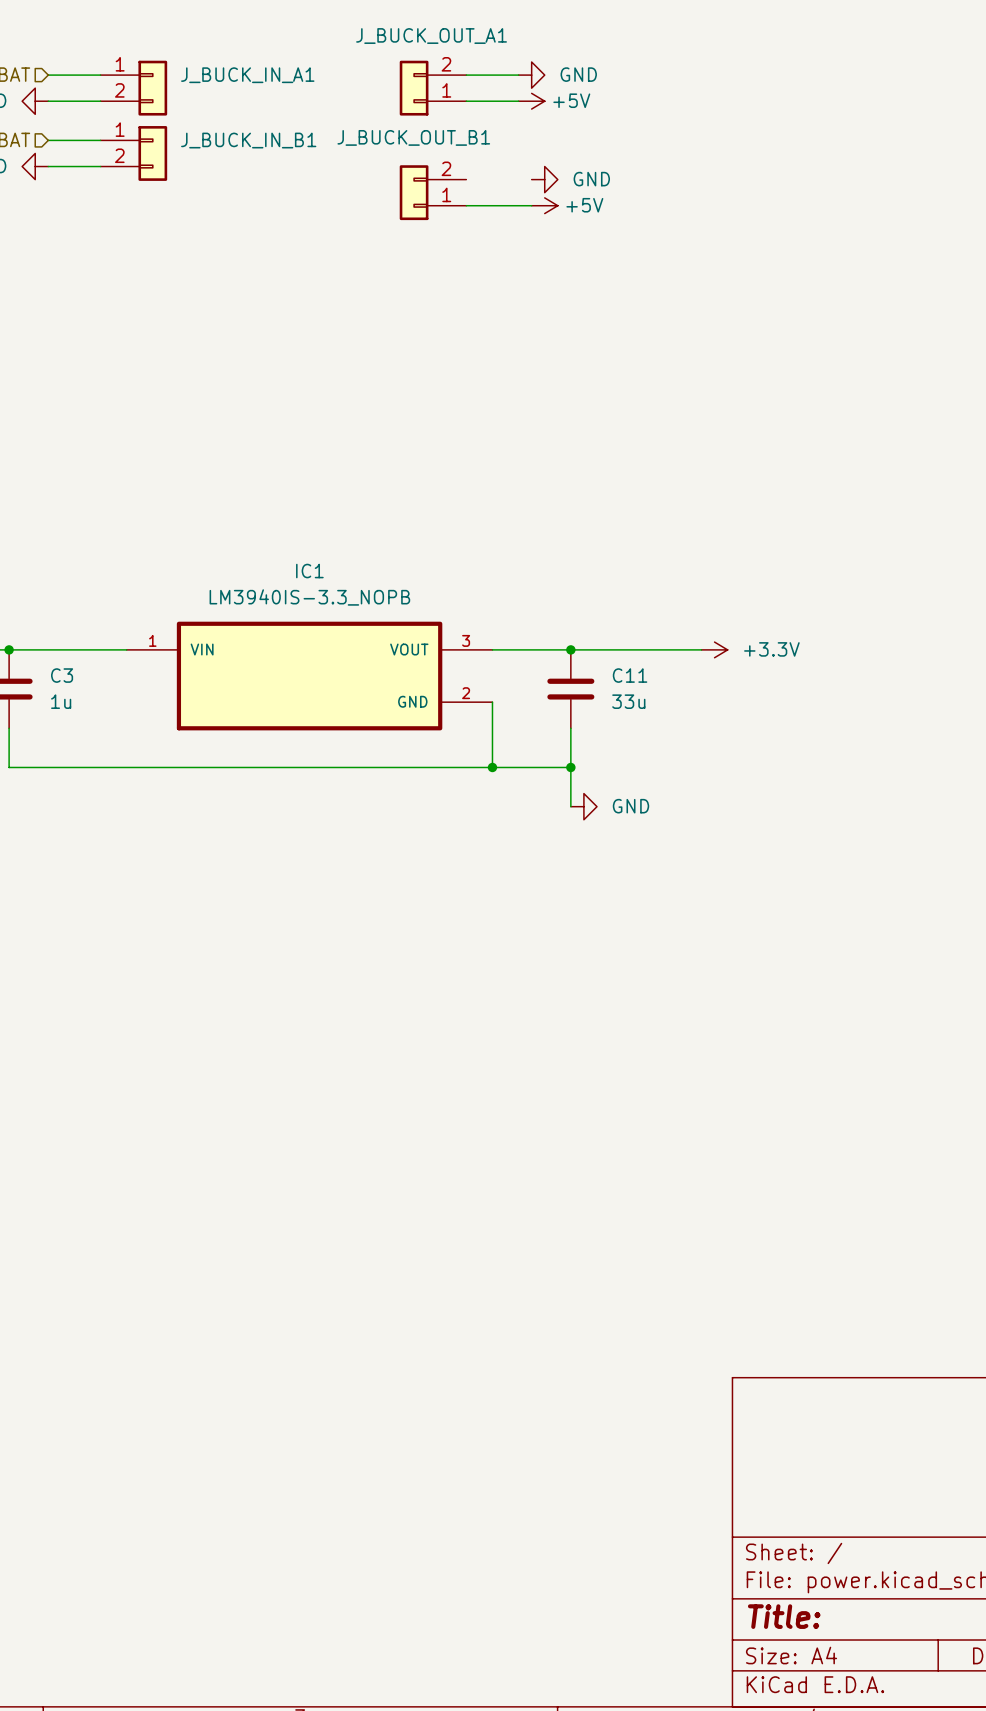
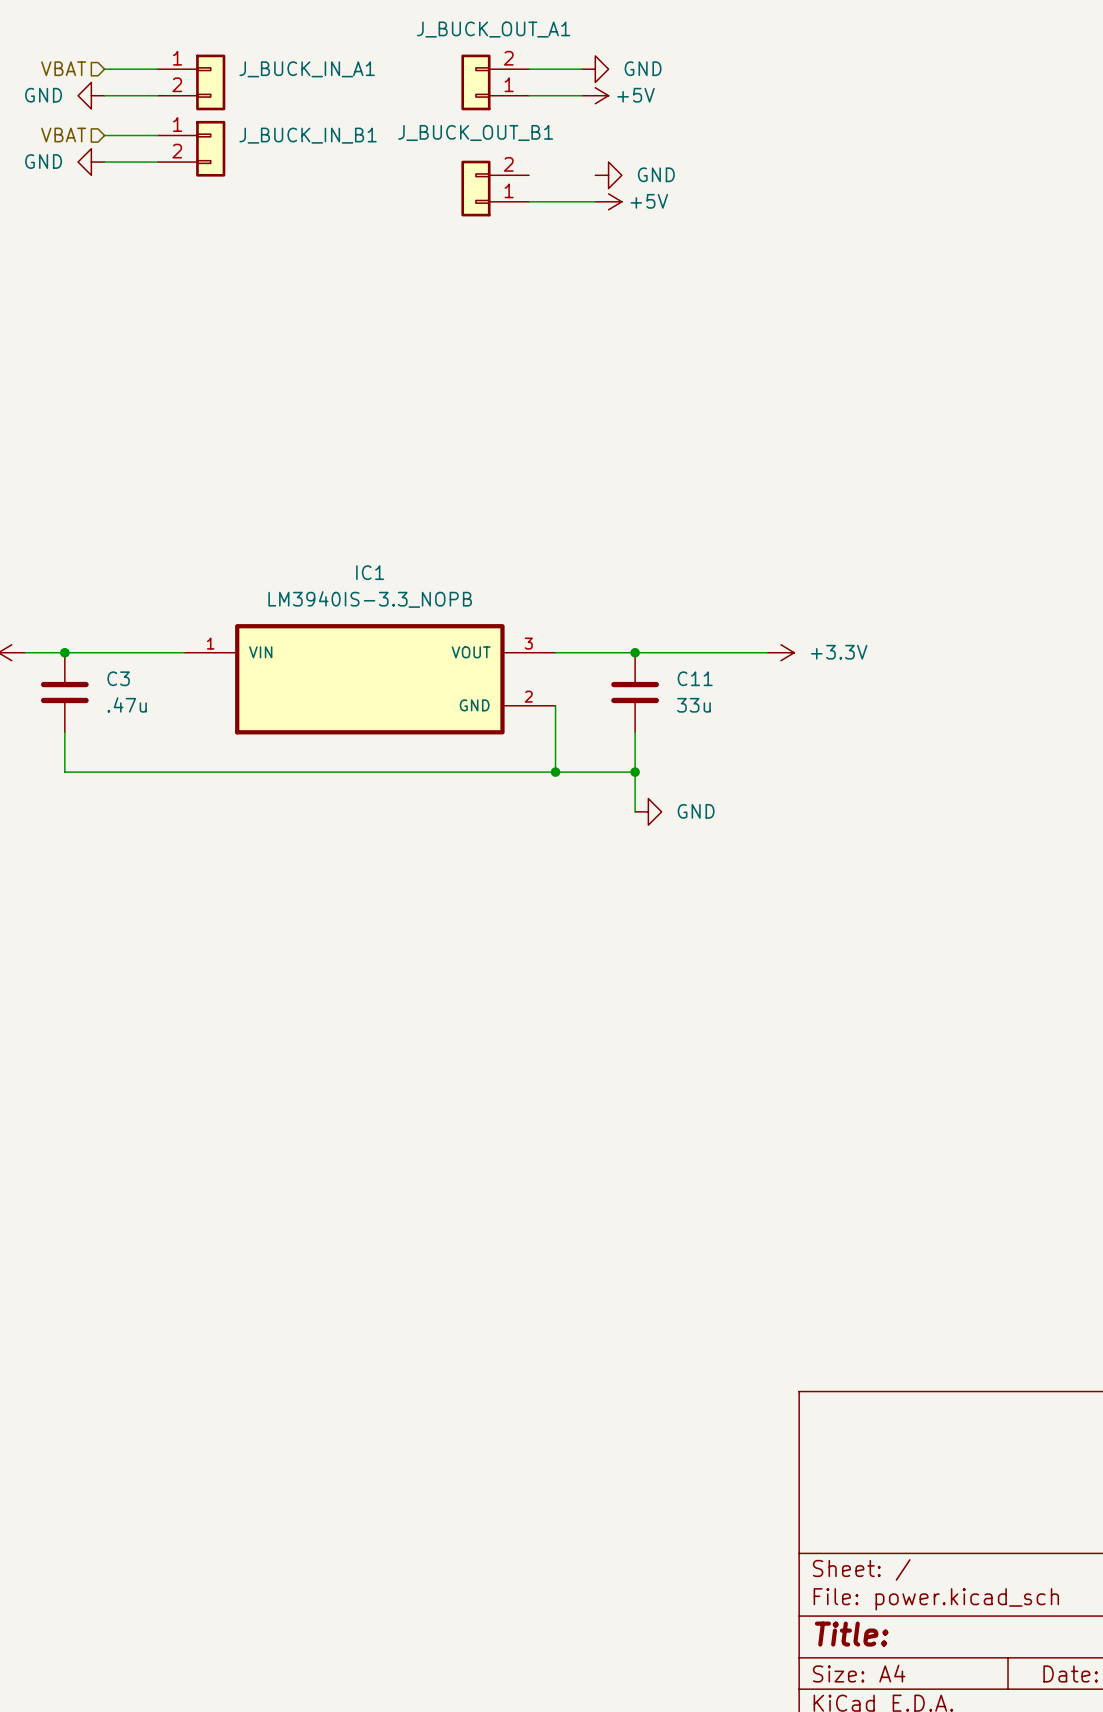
C3 value: 1u (61, 701) -> .47u (127, 704)

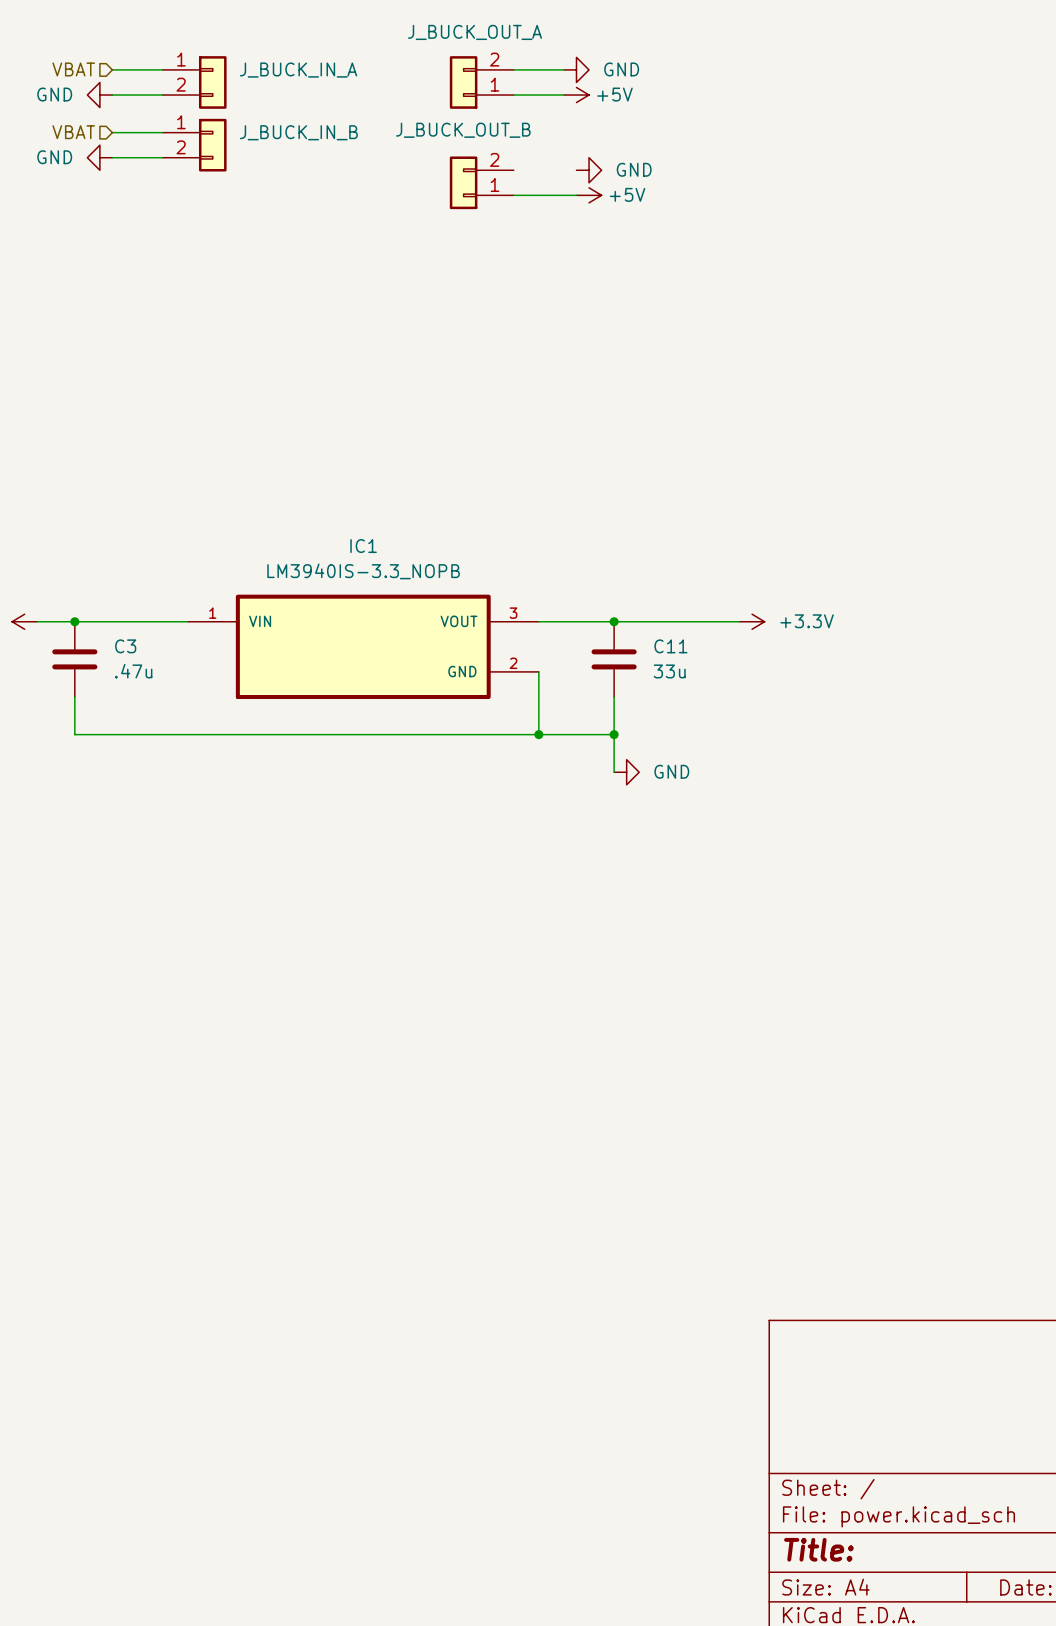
J_BUCK_OUT_A1 name: J_BUCK_OUT_A1 (493, 29) -> J_BUCK_OUT_A (474, 32)
J_BUCK_IN_A1 name: J_BUCK_IN_A1 (307, 69) -> J_BUCK_IN_A (298, 70)
J_BUCK_OUT_B1 name: J_BUCK_OUT_B1 (475, 132) -> J_BUCK_OUT_B (463, 130)
J_BUCK_IN_B1 name: J_BUCK_IN_B1 (308, 135) -> J_BUCK_IN_B (298, 132)

